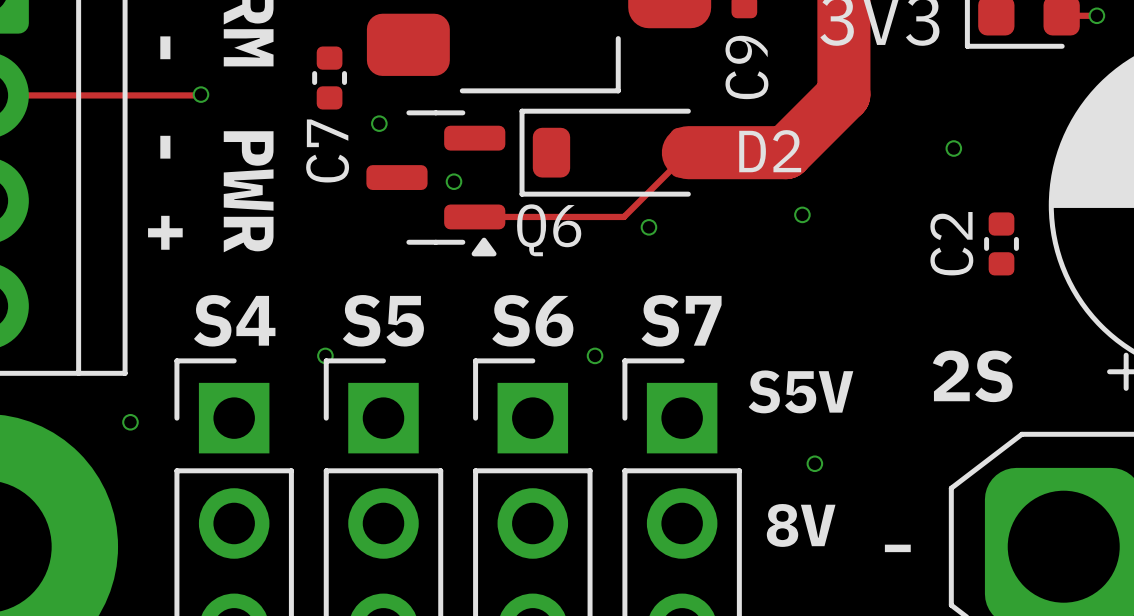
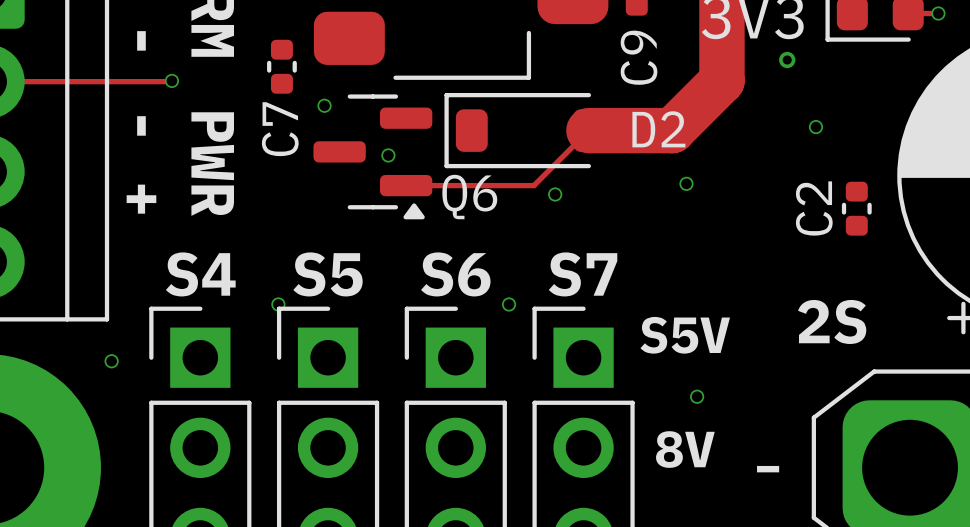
via: none -> (787, 59)

